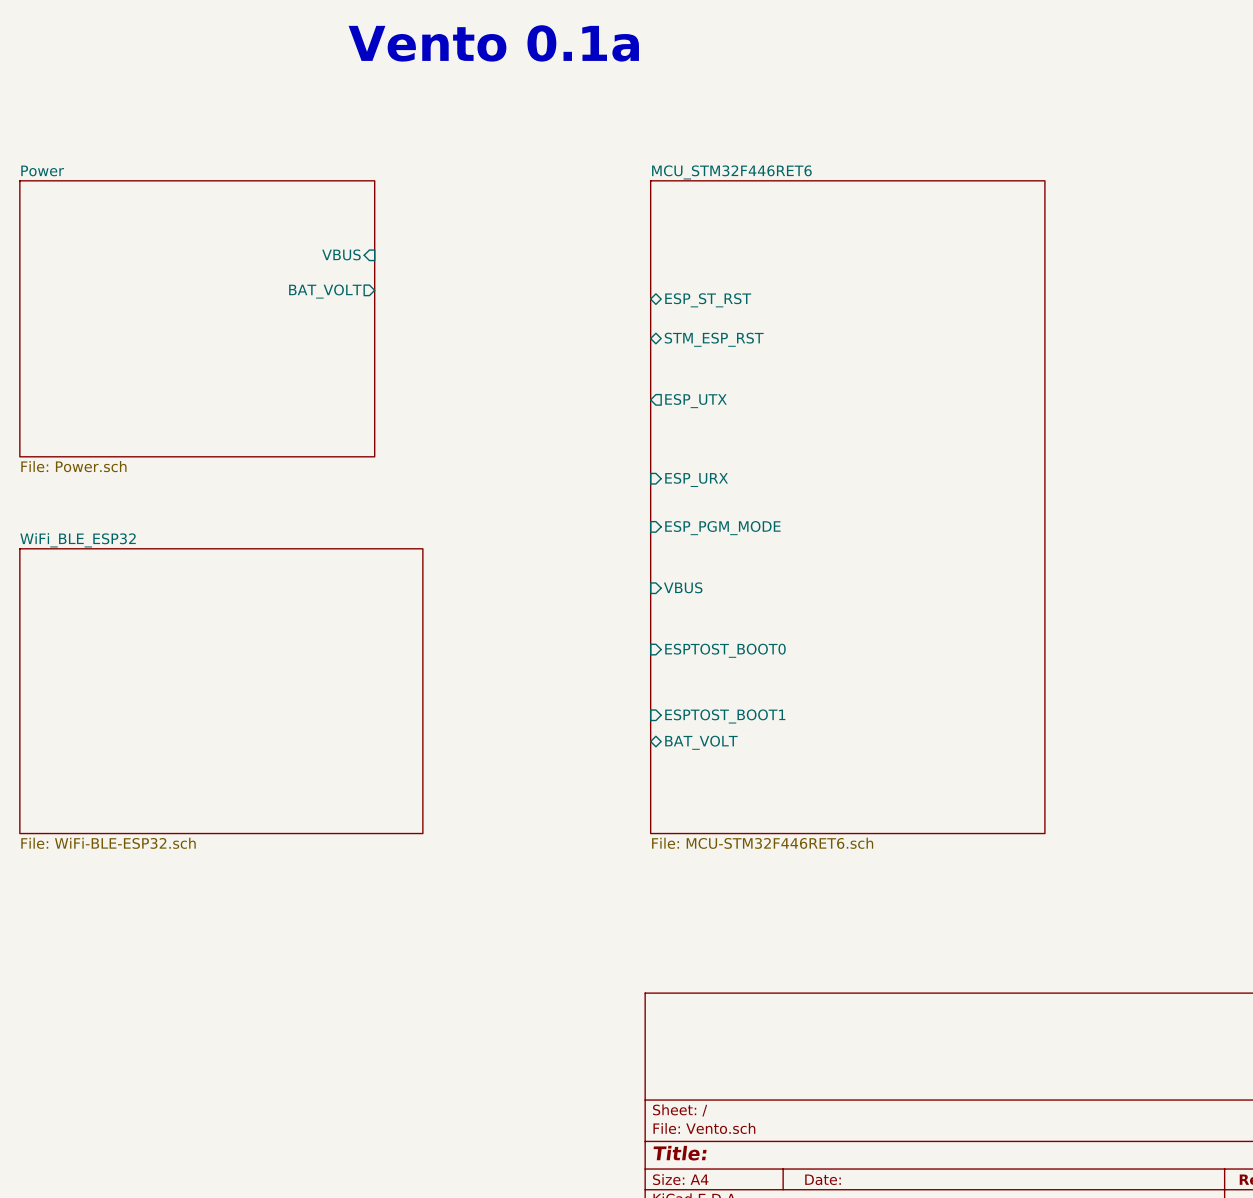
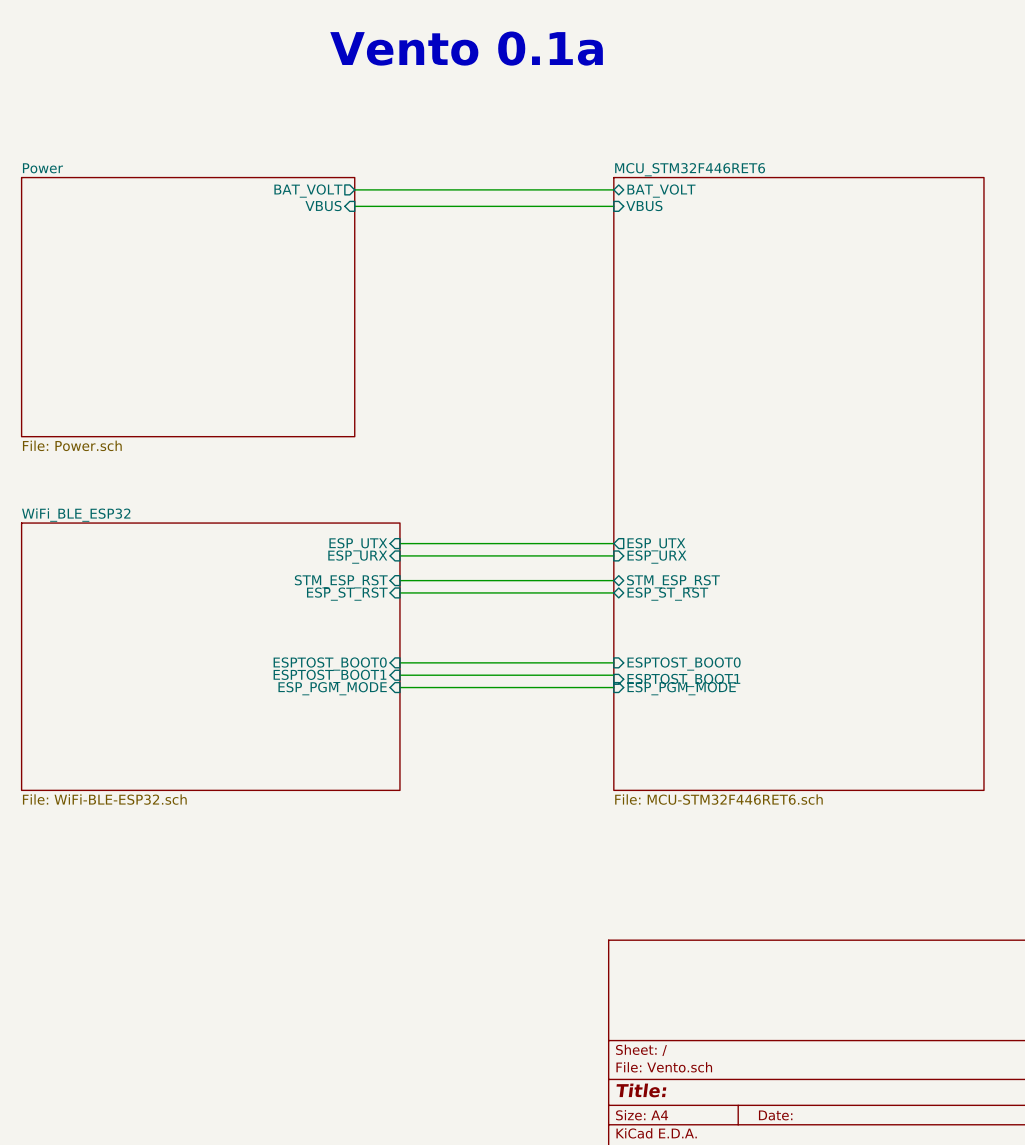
wire: none -> (354, 189) (613, 189)
sheet pin: none -> BAT_VOLT (661, 191)
wire: none -> (354, 206) (613, 206)
sheet pin: none -> VBUS (644, 206)
sheet pin position: VBUS (341, 254) -> VBUS (323, 206)
sheet pin position: BAT_VOLT (325, 291) -> BAT_VOLT (308, 191)
sheet pin: ESP_ST_RST (708, 300) -> none
sheet pin: STM_ESP_RST (714, 339) -> none
sheet pin: ESP_UTX (695, 401) -> none
sheet pin position: ESP_URX (696, 479) -> ESP_URX (656, 557)
sheet pin: ESP_PGM_MODE (722, 528) -> none
wire: none -> (399, 543) (613, 543)
sheet pin: none -> ESP_UTX (358, 544)
sheet pin: none -> ESP_UTX (656, 544)
wire: none -> (399, 555) (613, 555)
sheet pin: none -> ESP_URX (357, 557)
sheet pin: VBUS (683, 587) -> none
wire: none -> (399, 580) (613, 580)
sheet pin: none -> STM_ESP_RST (341, 581)
sheet pin: none -> STM_ESP_RST (673, 581)
wire: none -> (399, 592) (613, 592)
sheet pin: none -> ESP_ST_RST (347, 594)
sheet pin: none -> ESP_ST_RST (667, 594)
sheet pin position: ESPTOST_BOOT0 (725, 650) -> ESPTOST_BOOT0 (684, 664)
wire: none -> (399, 662) (613, 662)
sheet pin: none -> ESPTOST_BOOT0 (330, 664)
wire: none -> (399, 675) (613, 675)
sheet pin: none -> ESPTOST_BOOT1 (329, 676)
wire: none -> (399, 687) (613, 687)
sheet pin: none -> ESP_PGM_MODE (332, 688)
sheet pin: none -> ESP_PGM_MODE (681, 688)
sheet pin: BAT_VOLT (701, 742) -> none

